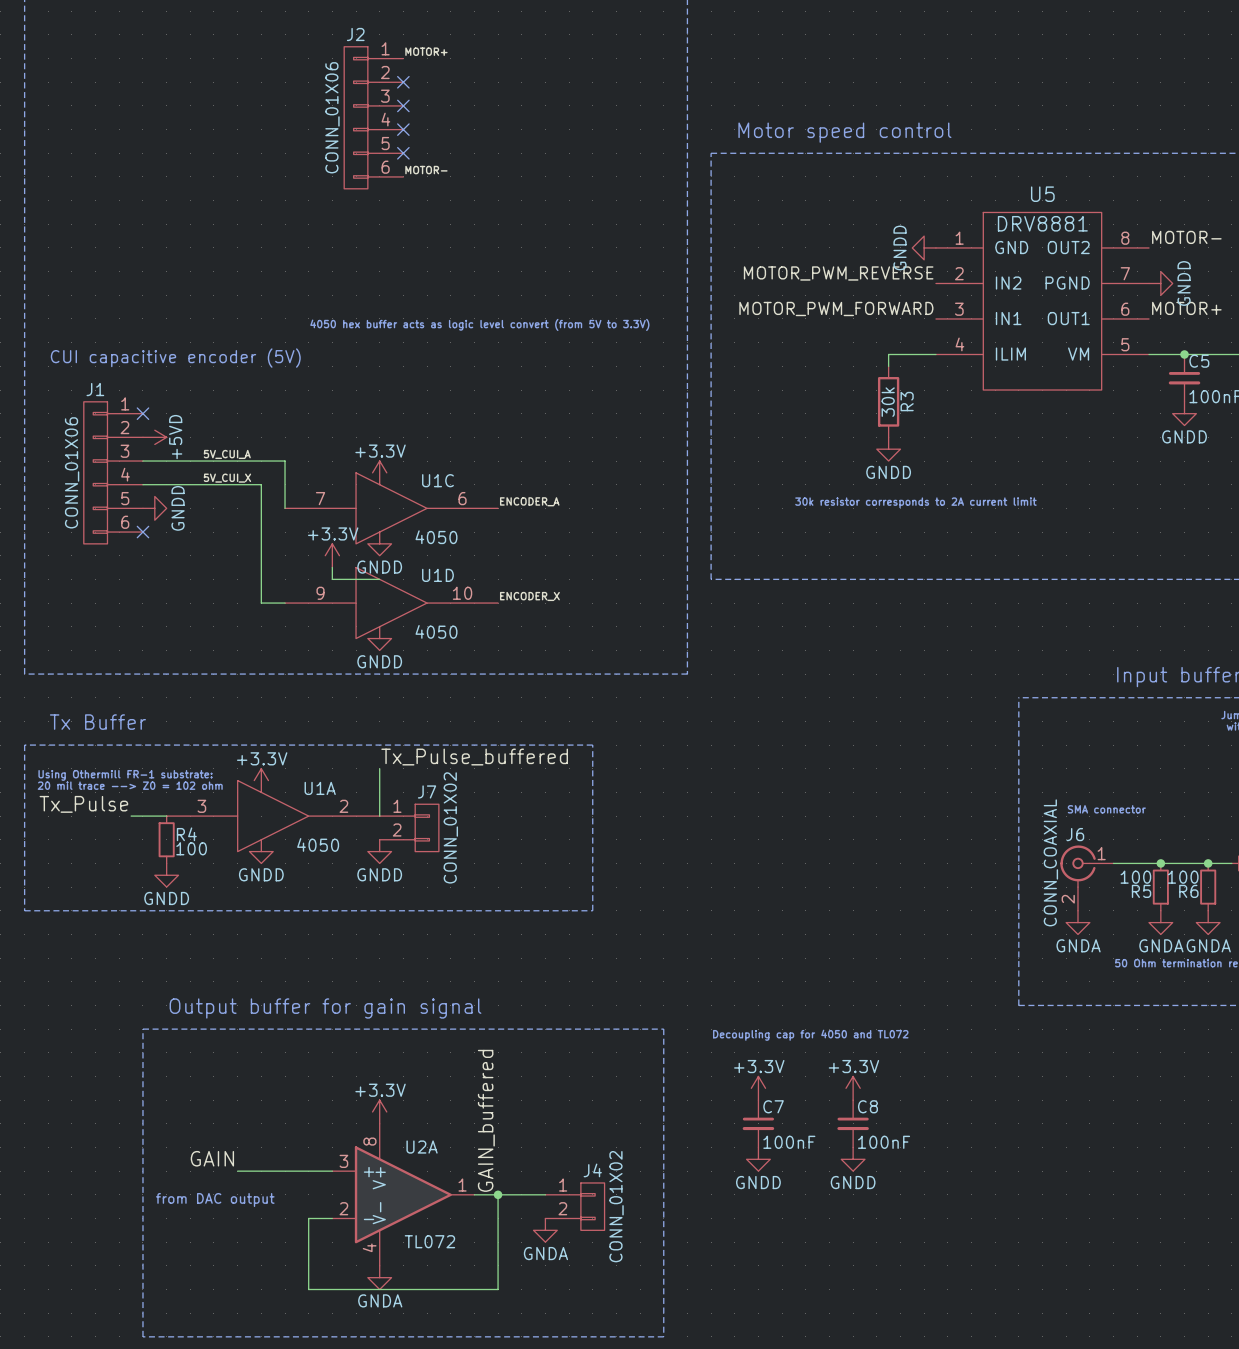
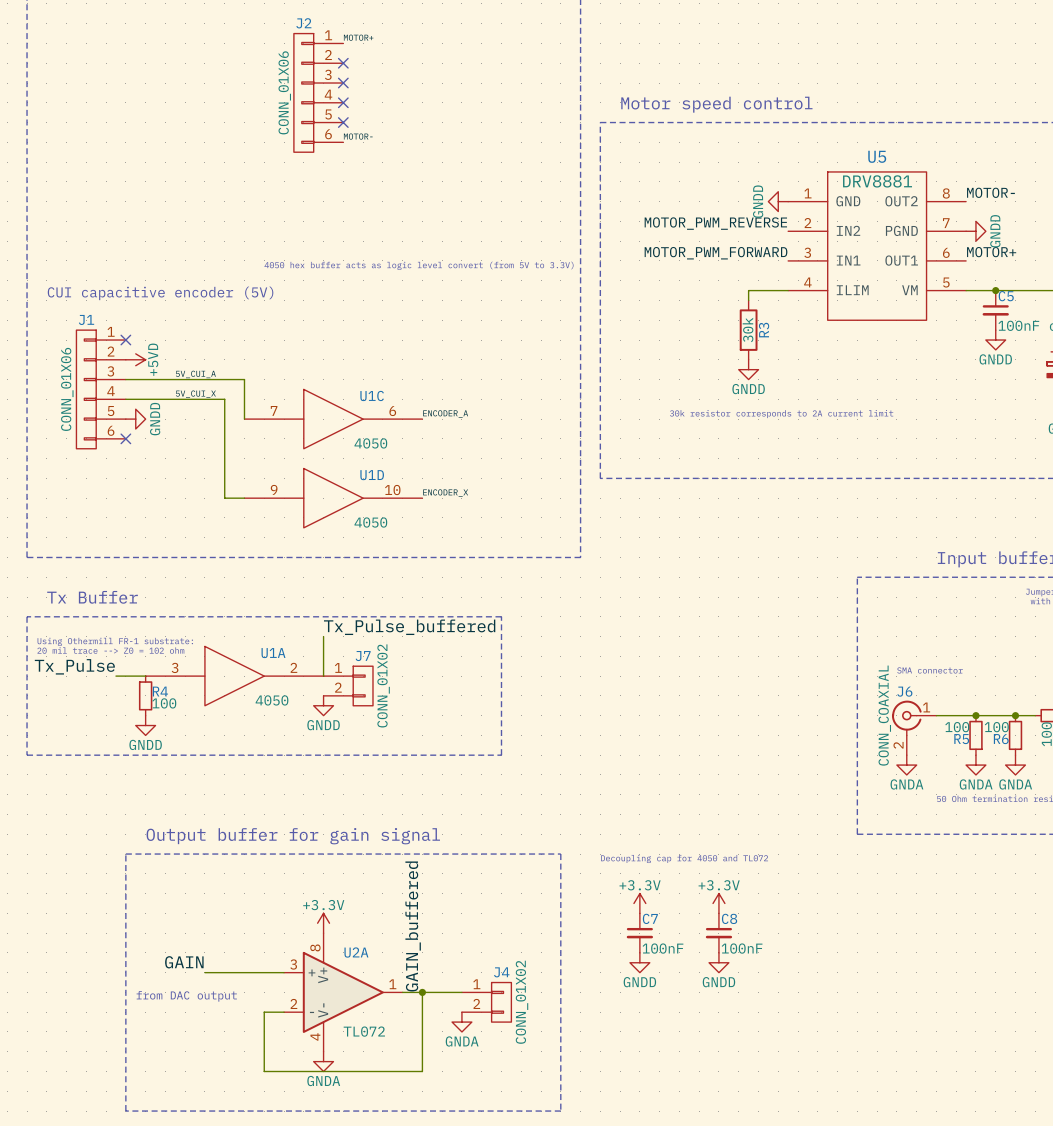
power symbol: +3.3V (379, 472) -> none
power symbol: GNDD (379, 543) -> none
power symbol: +3.3V (332, 555) -> none
wire: (332, 567) (332, 579) (379, 579) -> none
power symbol: GNDD (379, 638) -> none
power symbol: +3.3V (261, 780) -> none
power symbol: GNDD (261, 851) -> none

